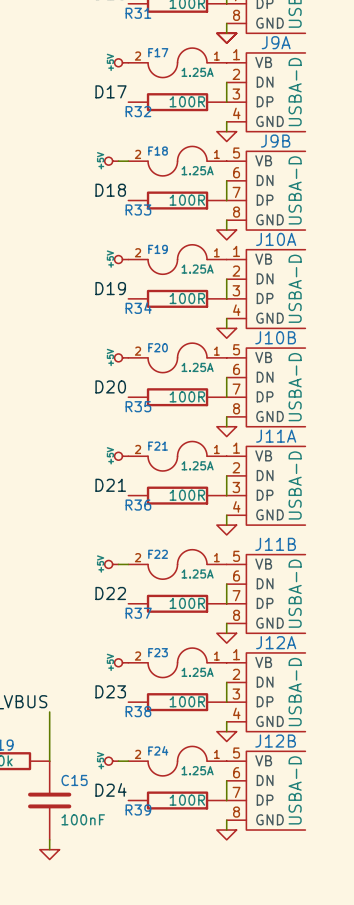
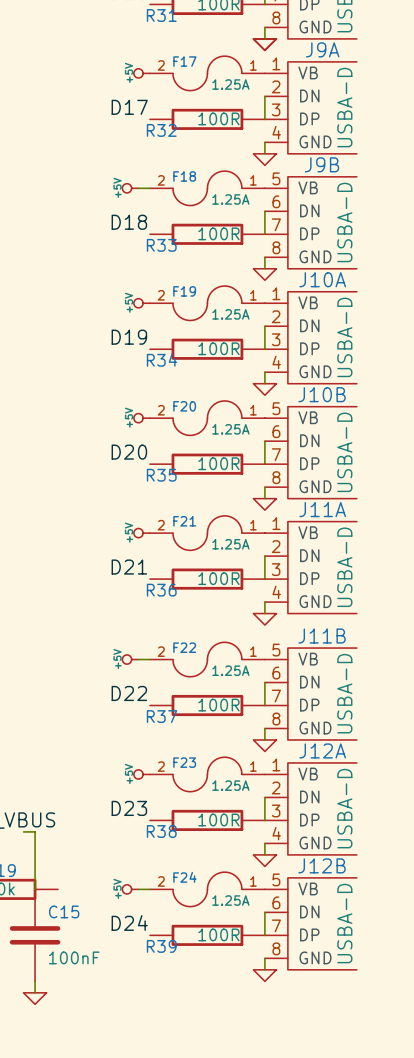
wire: none -> (23, 831) (35, 831) (35, 889)
wire: (49, 711) (49, 761) -> none
C15 position: (49, 800) -> (35, 935)
wire: (49, 839) (49, 849) -> (35, 981) (35, 992)
power symbol position: (49, 854) -> (35, 998)

